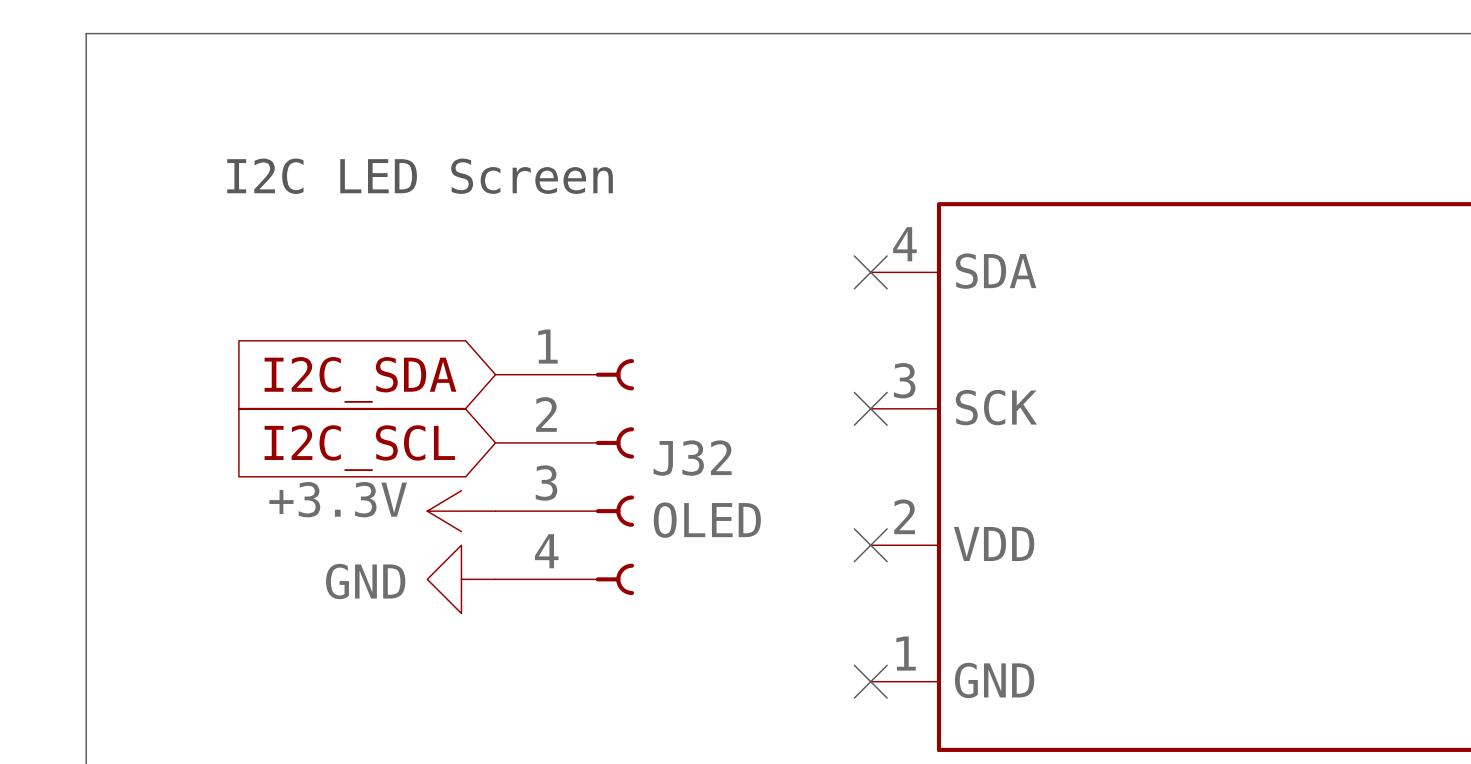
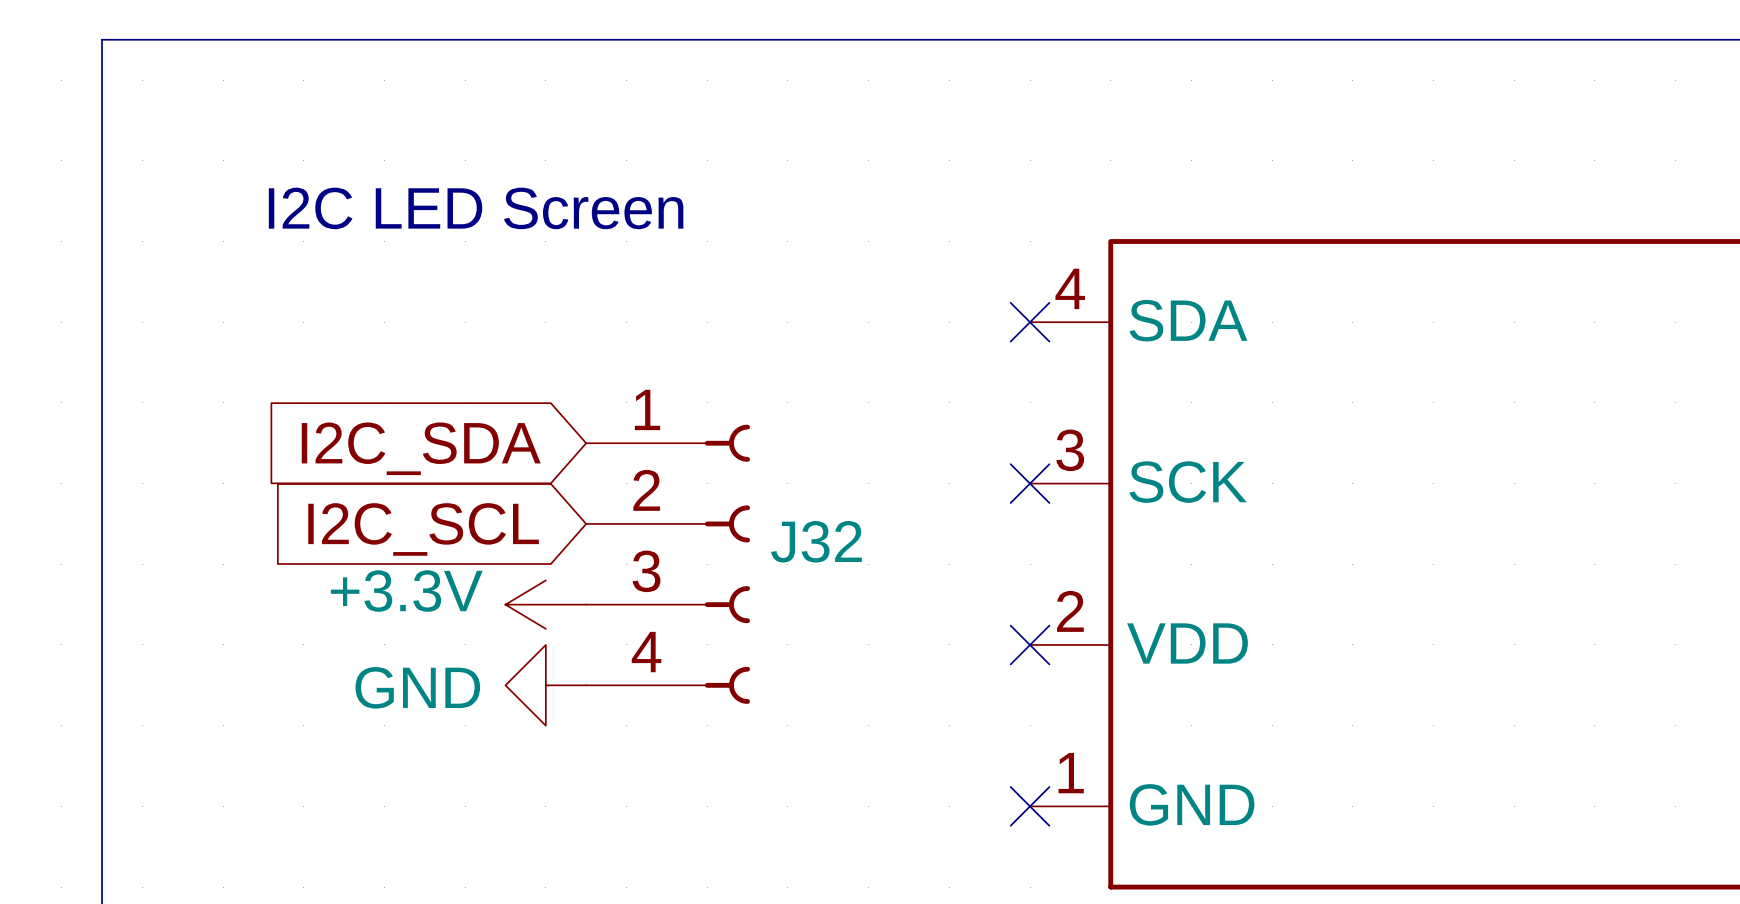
J32 value: OLED (707, 520) -> none

